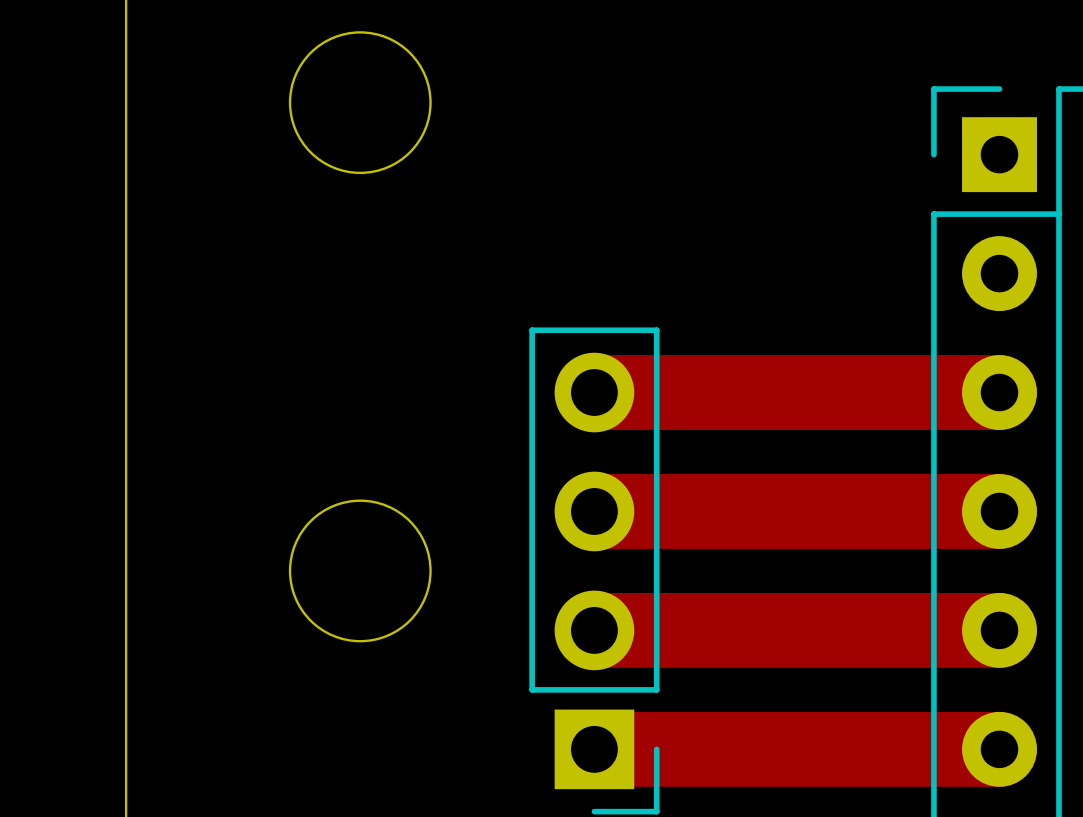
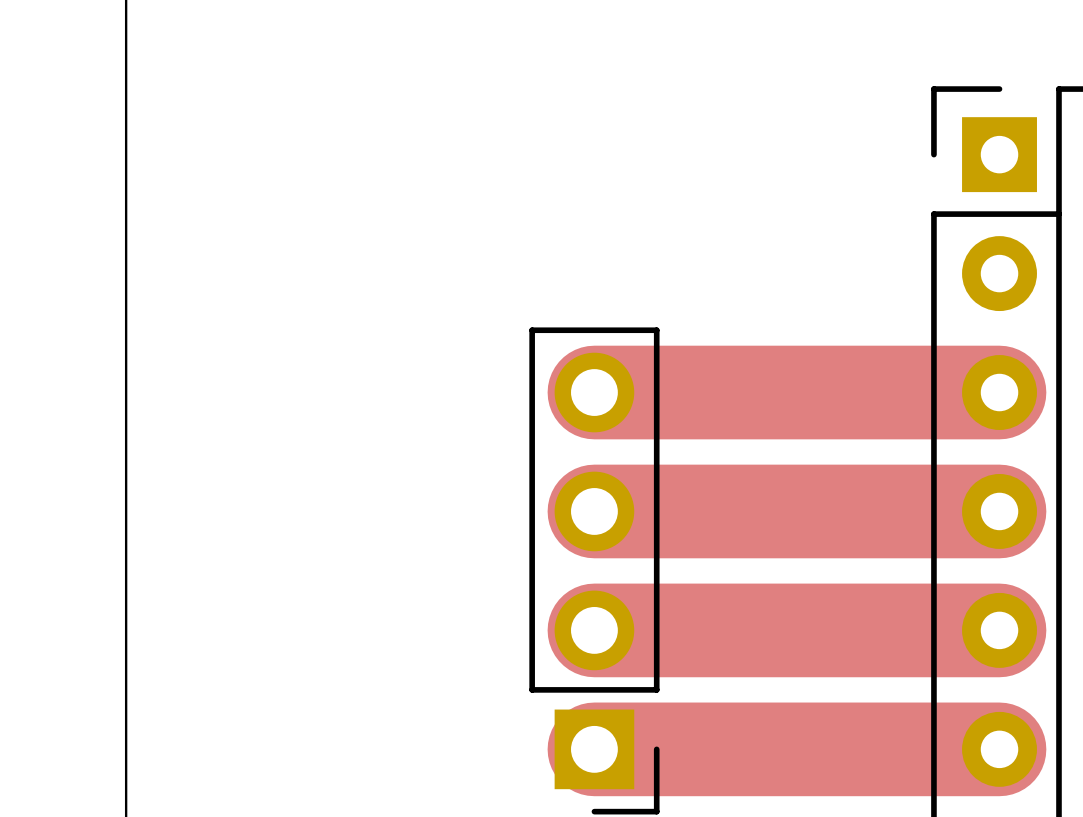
round board edge: [288, 31, 432, 175] -> none
track width: thin (594, 392) (999, 392) -> thick (594, 392) (999, 392)
round board edge: [288, 499, 432, 643] -> none
track width: thin (594, 511) (999, 511) -> thick (594, 511) (999, 511)
track width: thin (594, 630) (999, 630) -> thick (594, 630) (999, 630)
track width: thin (594, 749) (999, 749) -> thick (594, 749) (999, 749)

